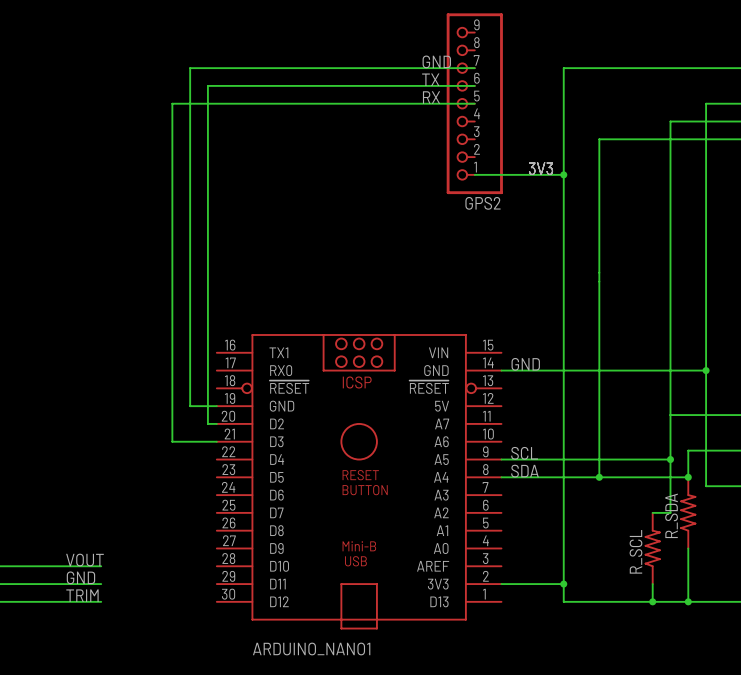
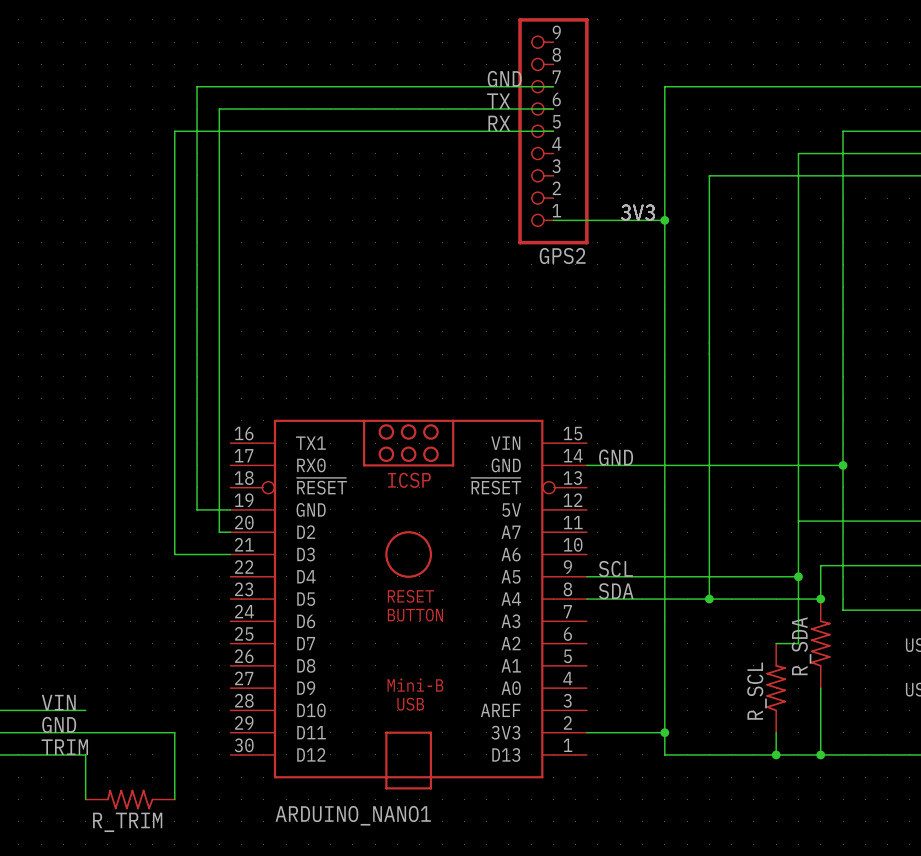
label: VOUT (84, 560) -> VIN (58, 702)
wire: none -> (85, 732) (174, 732) (174, 799)
wire: none -> (85, 754) (85, 799)
R_TRIM: none -> (130, 799)

